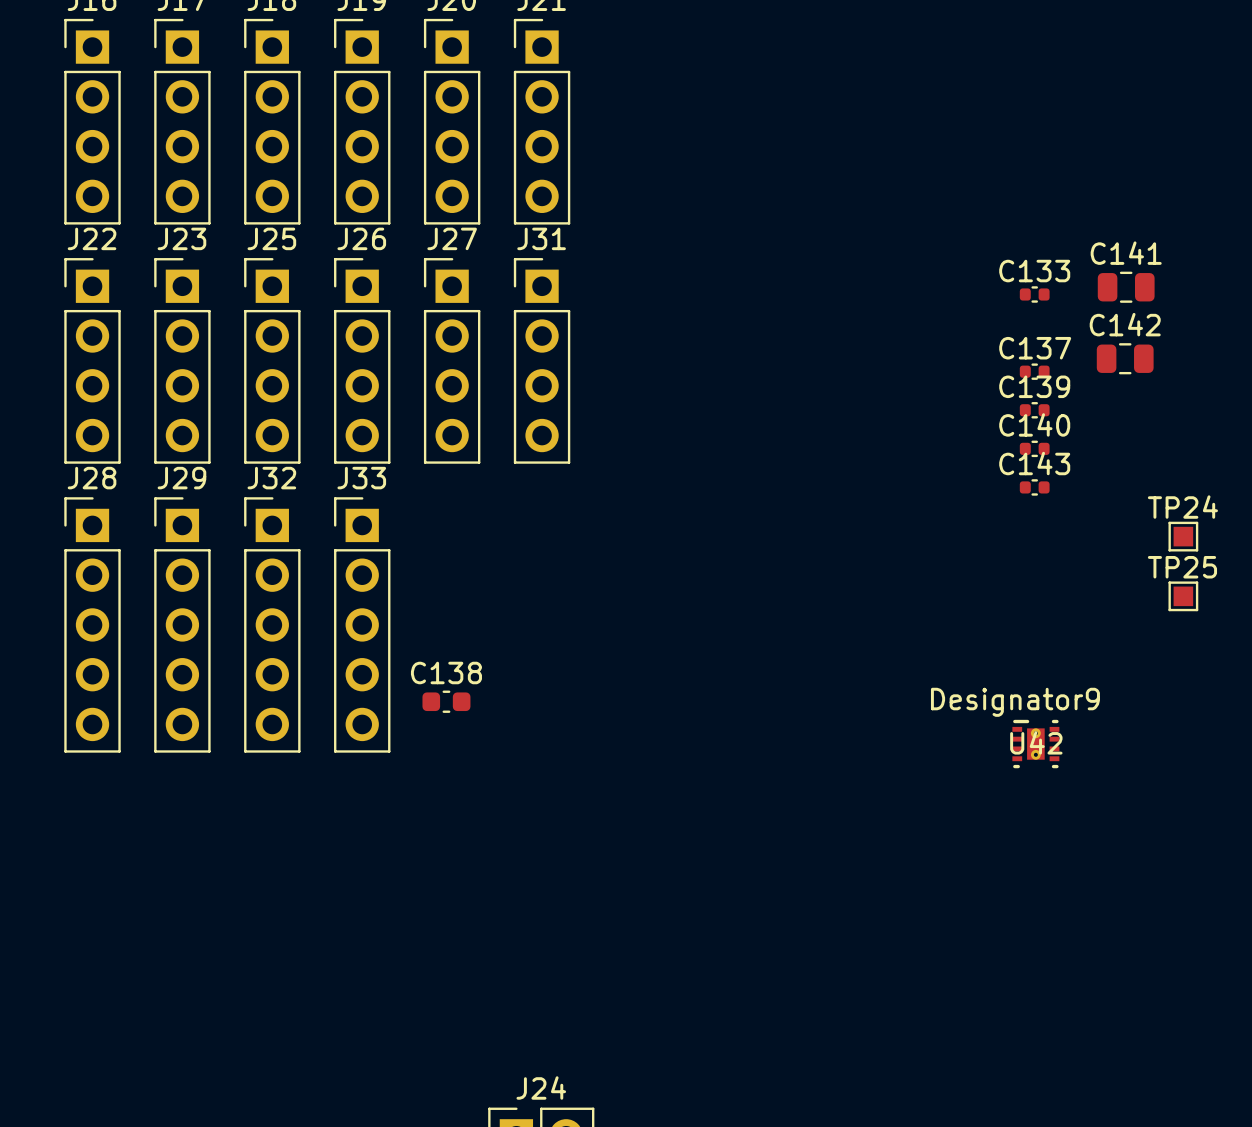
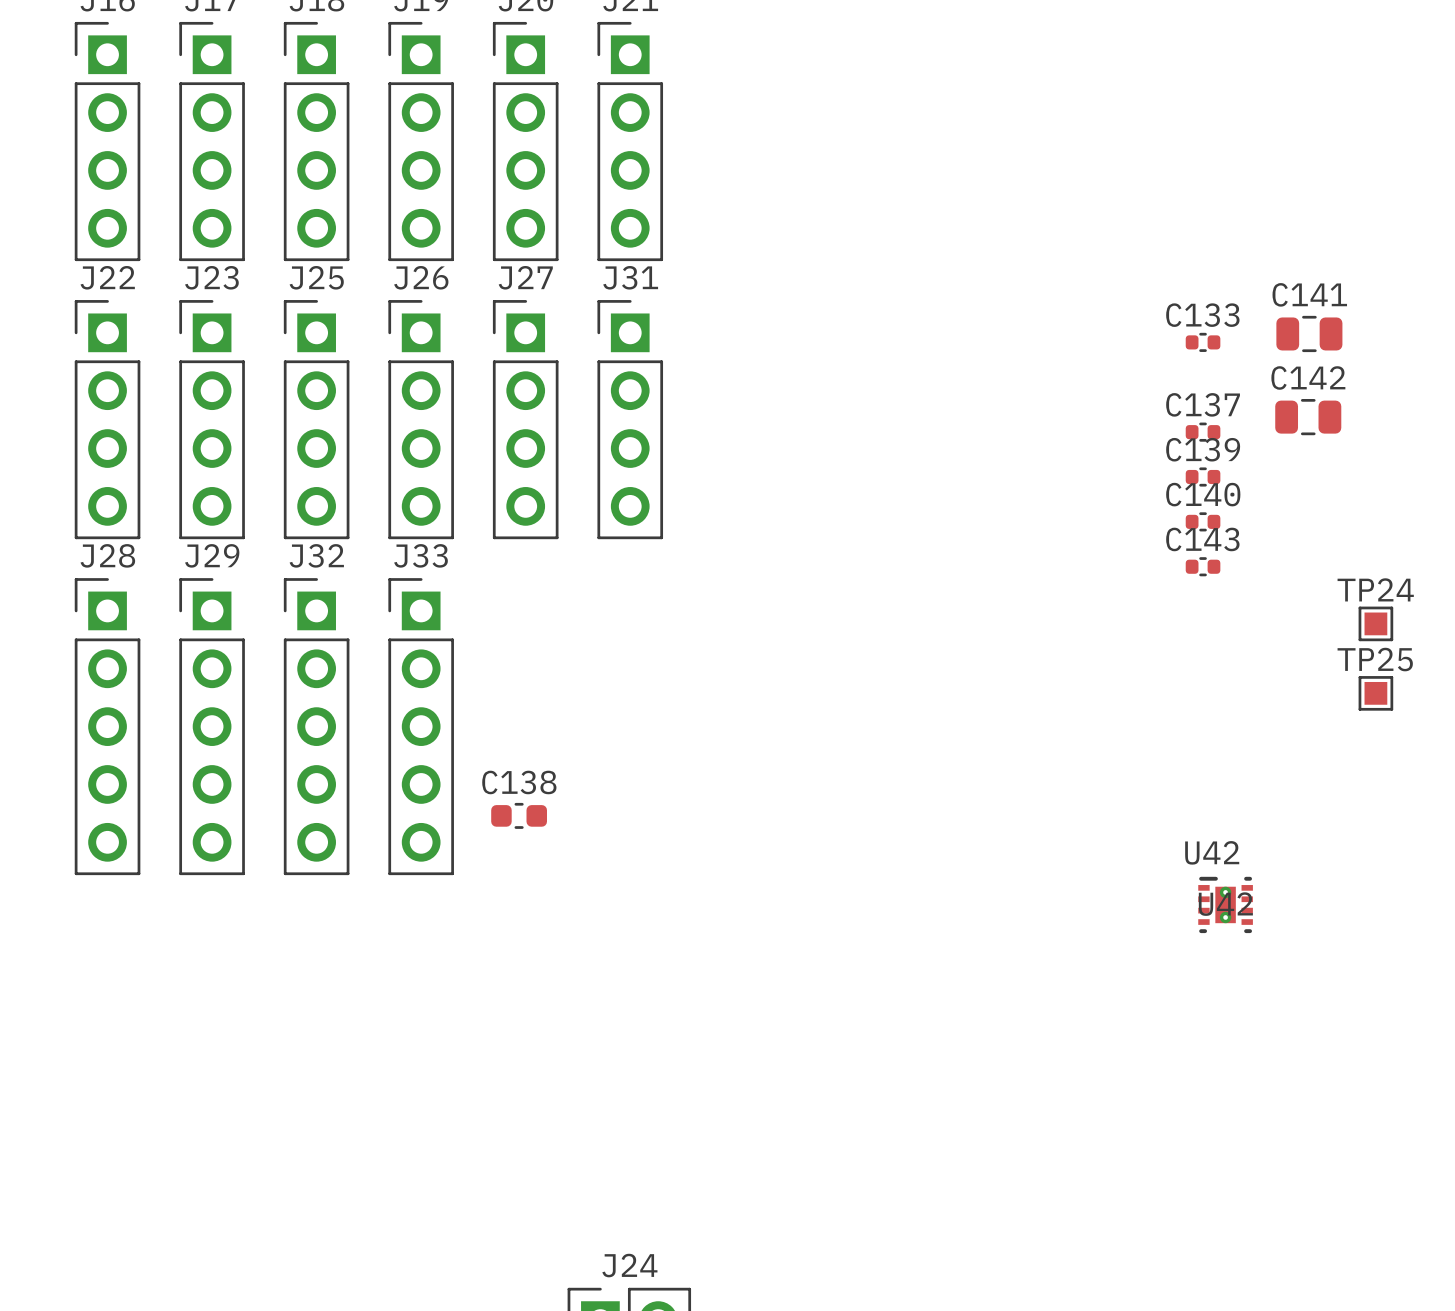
U42 text: Designator9 (1015, 702) -> none
U42 text: none -> U42 (1212, 852)
U42 position: (1035, 744) -> (1225, 904)

